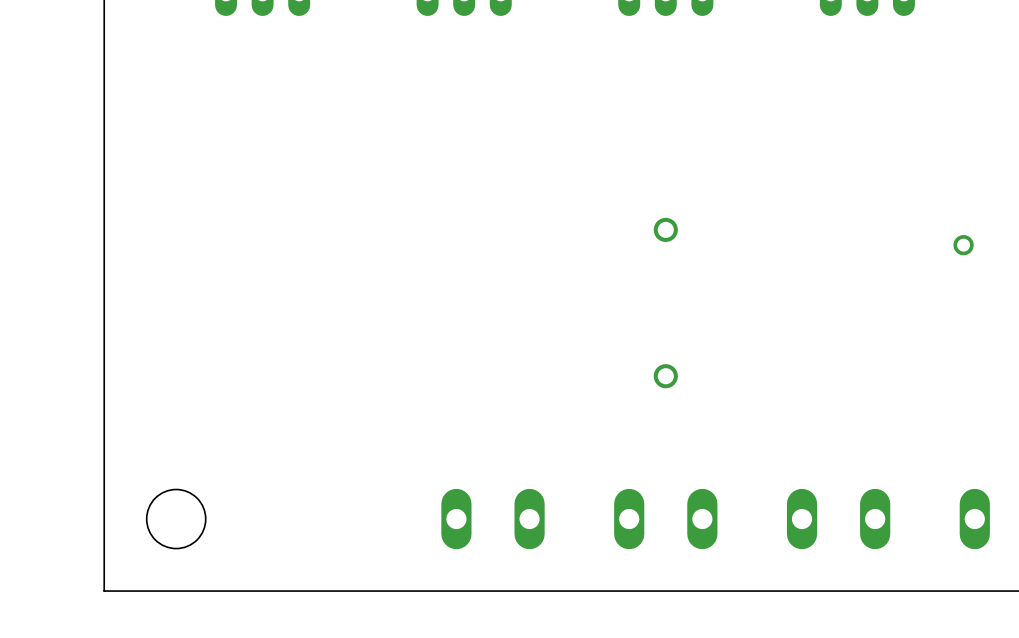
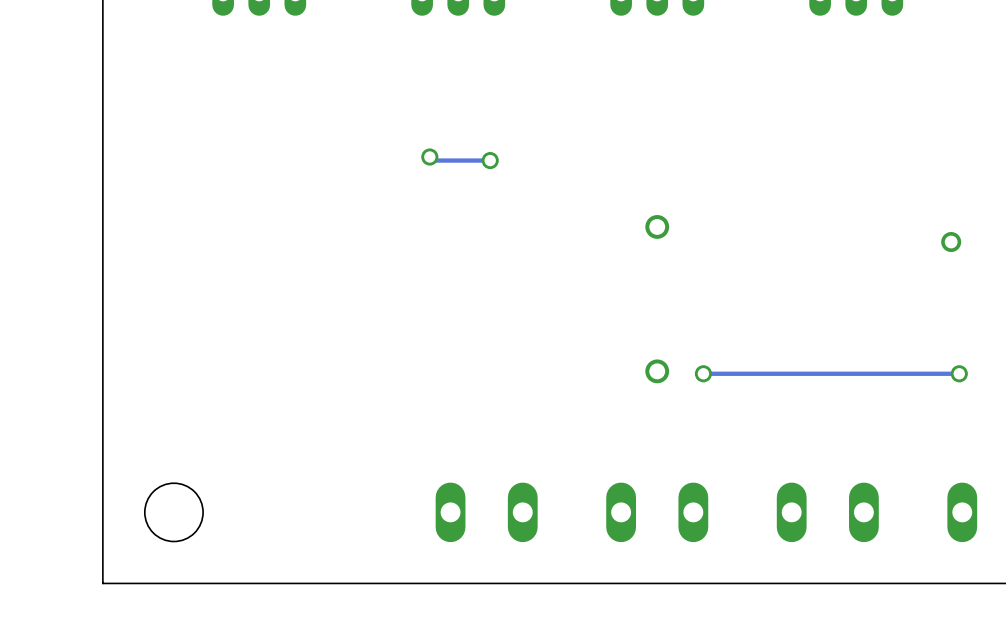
track: none -> (429, 157) (433, 160) (490, 160)
via: none -> (429, 157)
via: none -> (490, 160)
via: none -> (703, 373)
track: none -> (959, 373) (703, 373)
via: none -> (959, 373)

